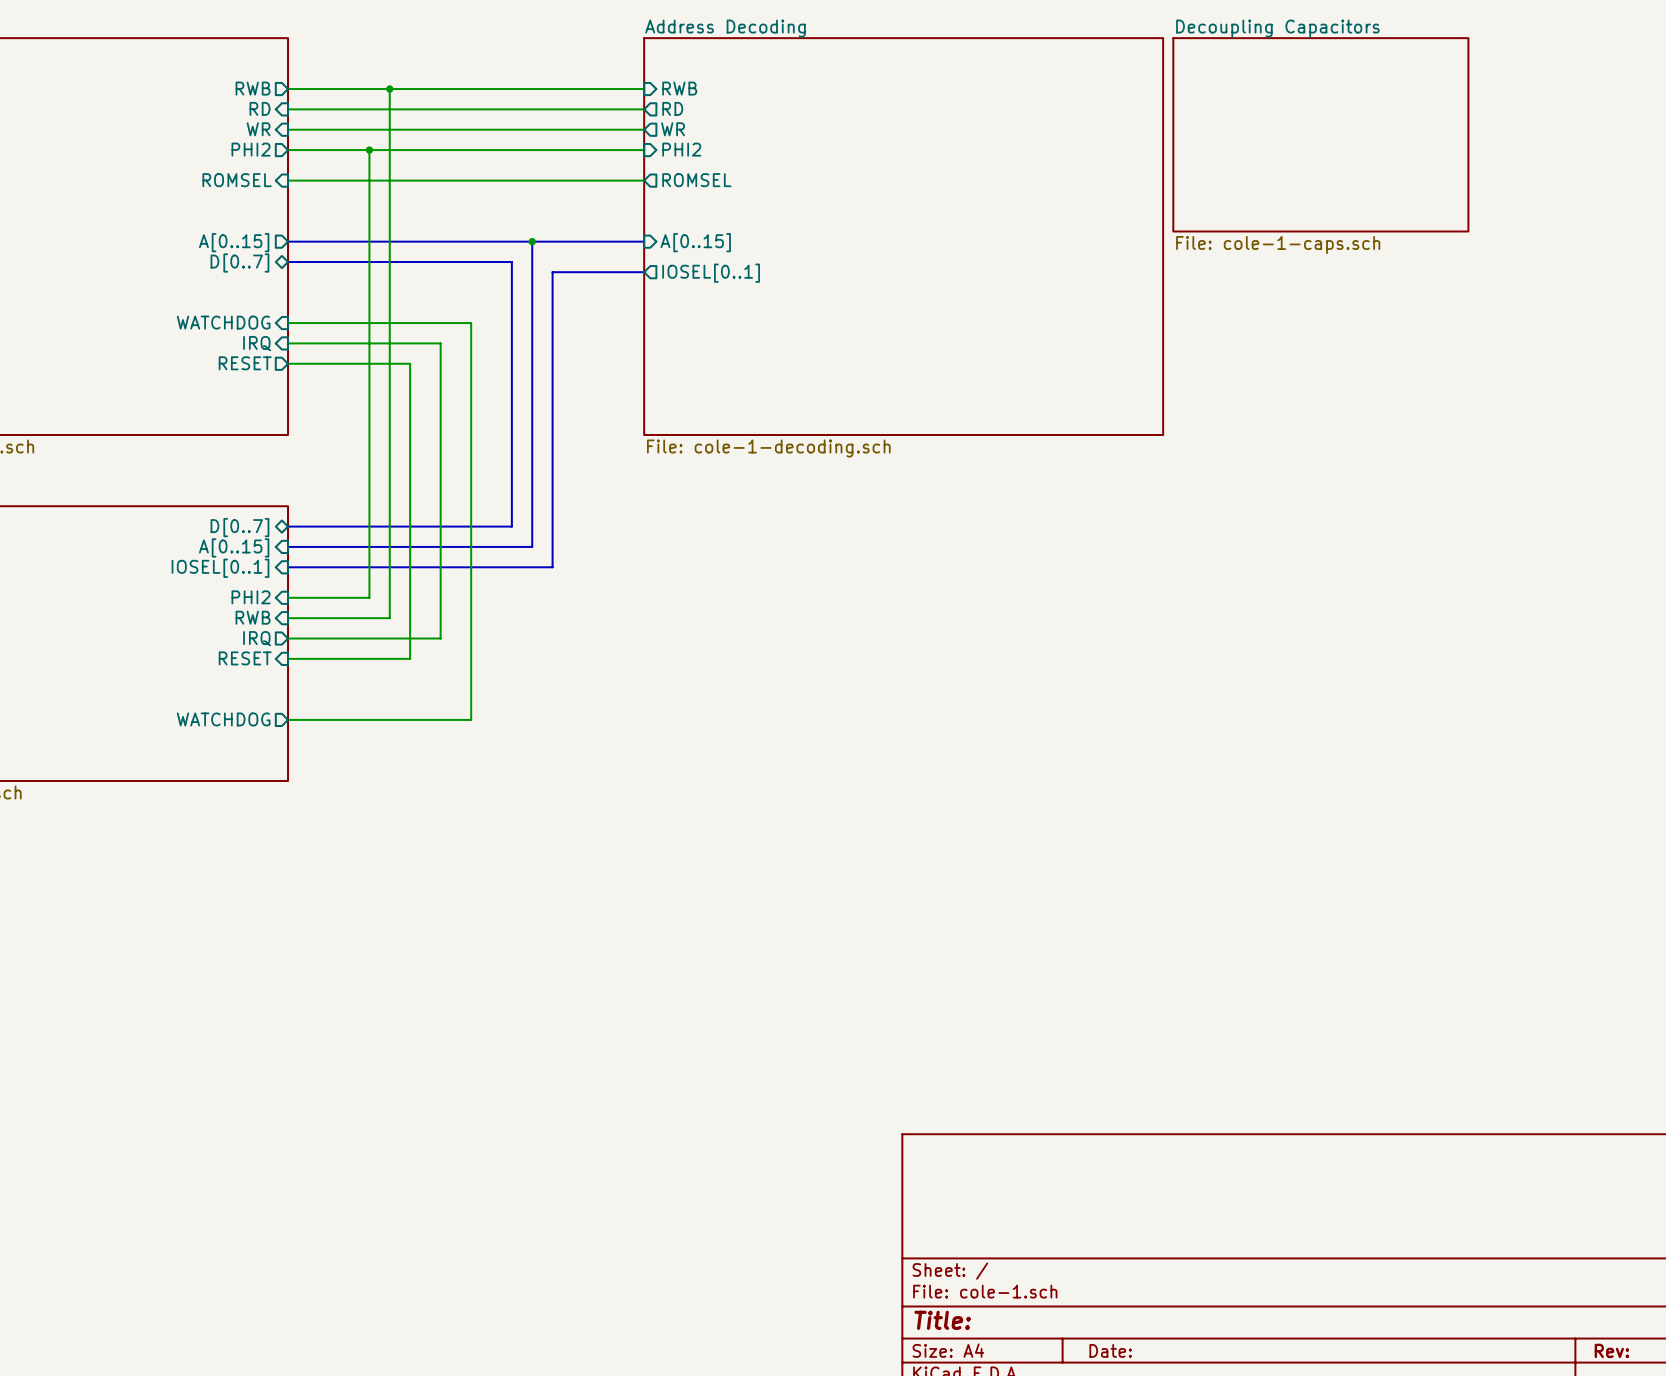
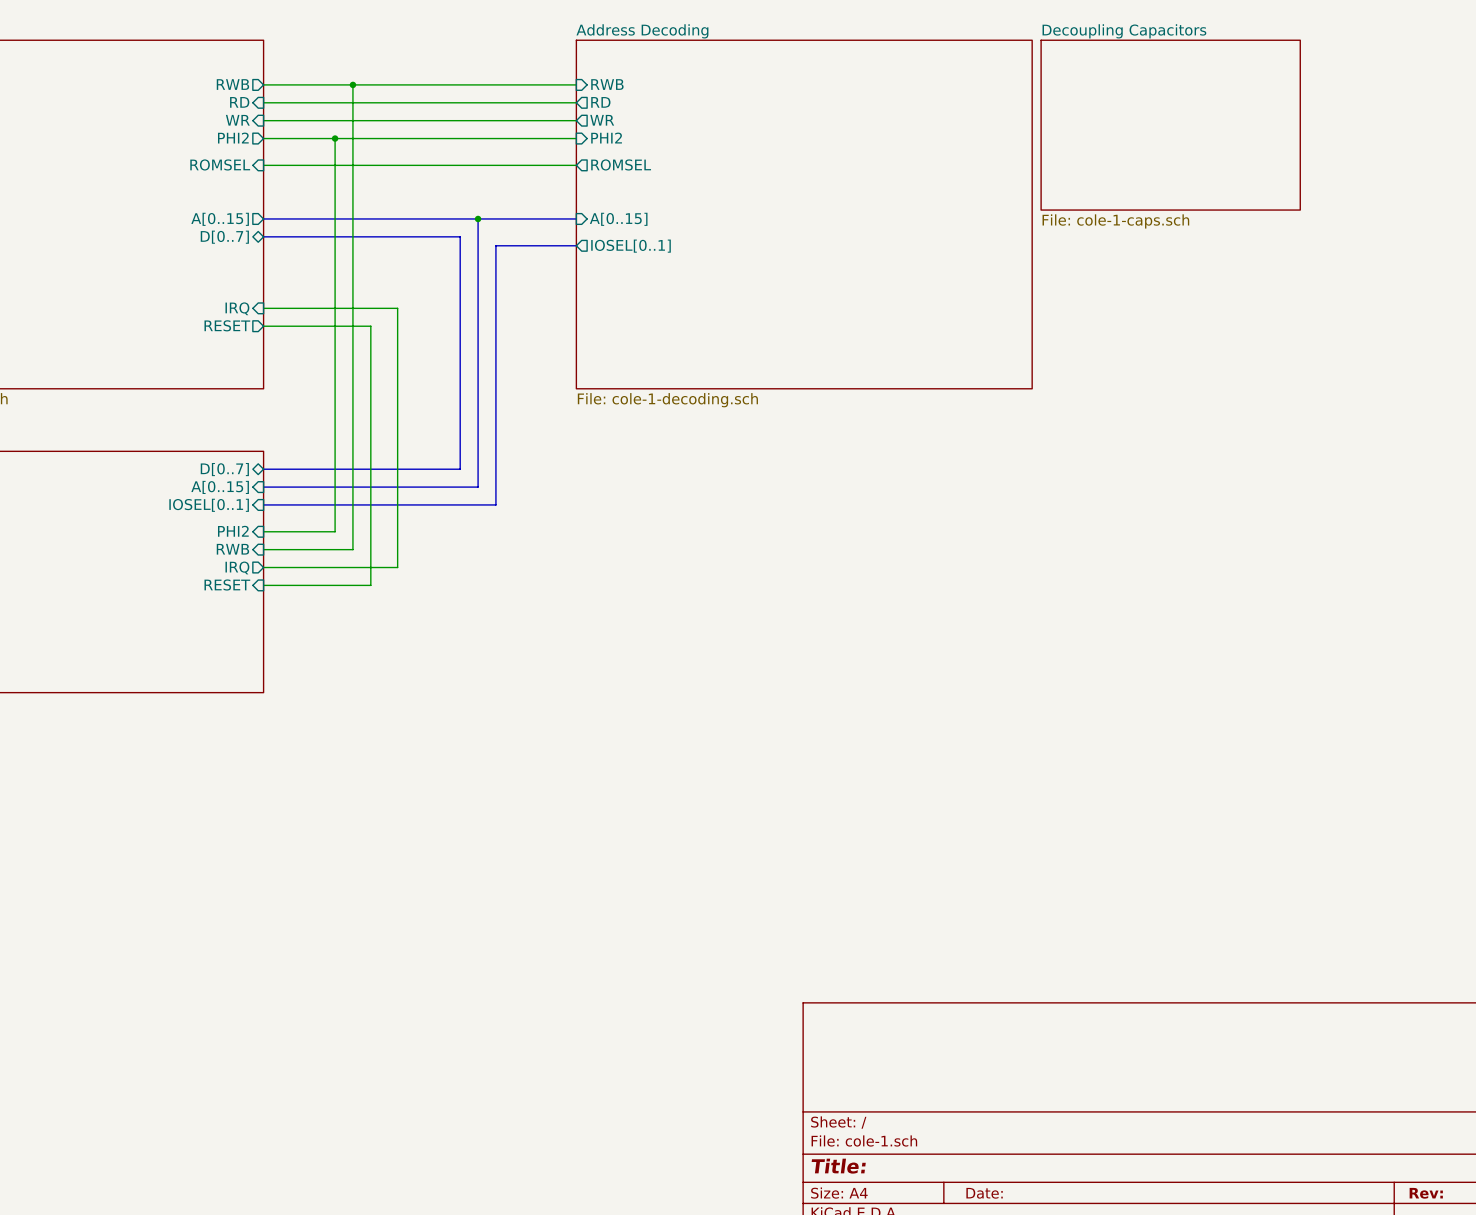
sheet pin: WATCHDOG (223, 322) -> none
wire: (288, 323) (471, 323) (471, 719) (288, 719) -> none
sheet pin: WATCHDOG (223, 719) -> none

